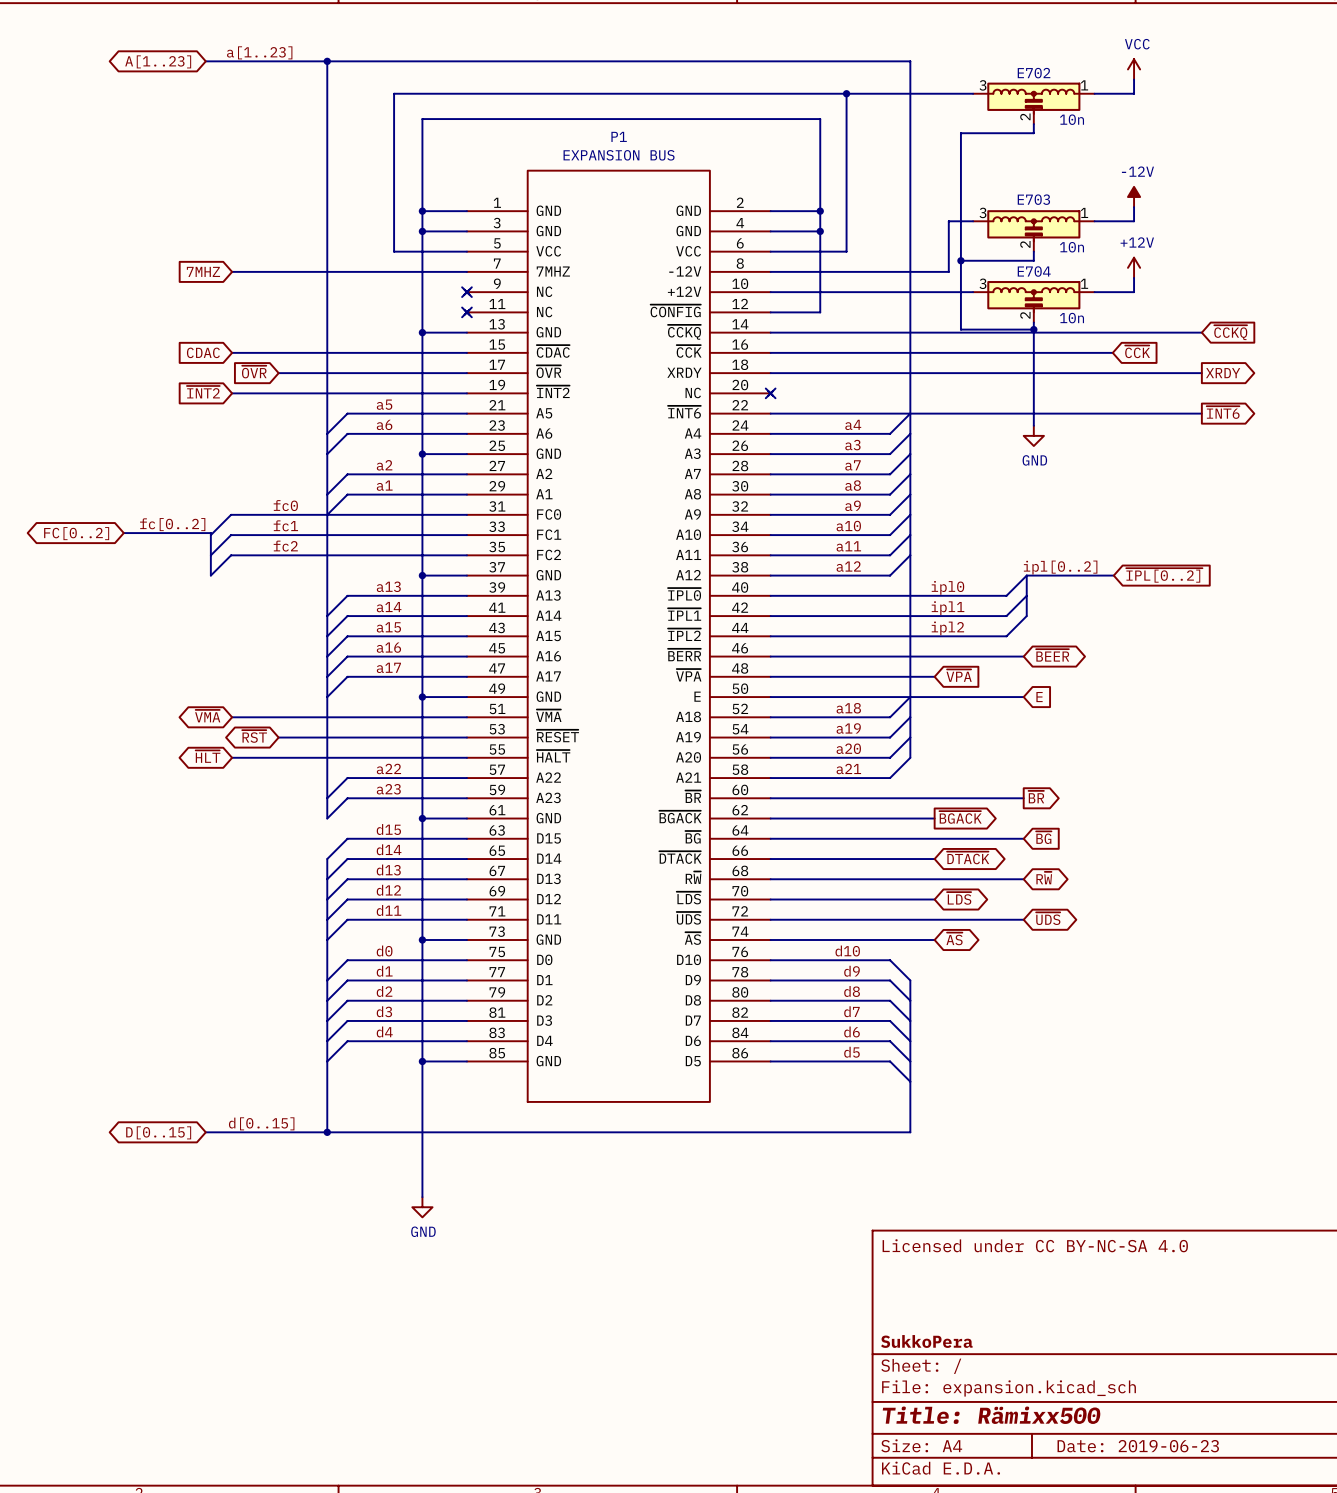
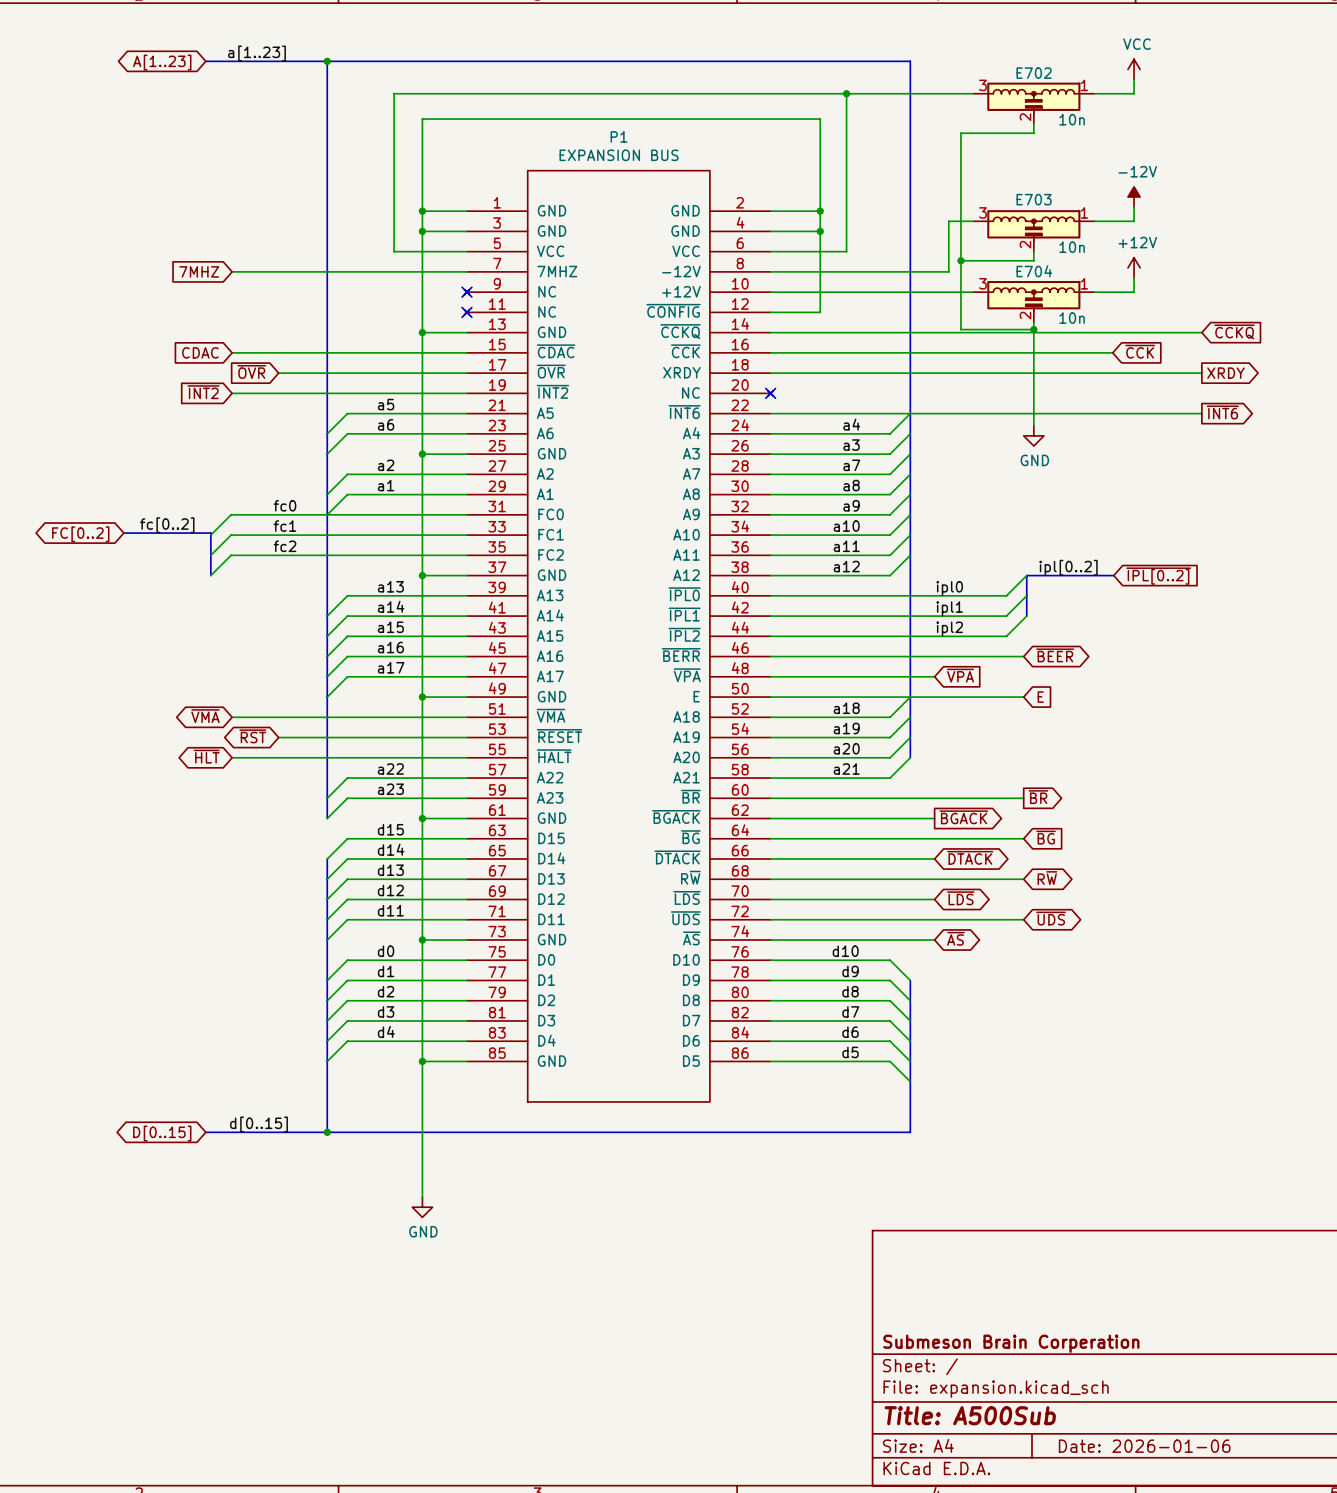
title block: Licensed under CC BY-NC-SA 4.0 (1035, 1245) -> none
title block: SukkoPera (926, 1341) -> Submeson Brain Corperation (1011, 1343)
title block: Title: Rämixx500 (991, 1415) -> Title: A500Sub (970, 1415)
title block: Date: 2019-06-23 (1138, 1446) -> Date: 2026-01-06 (1144, 1446)

